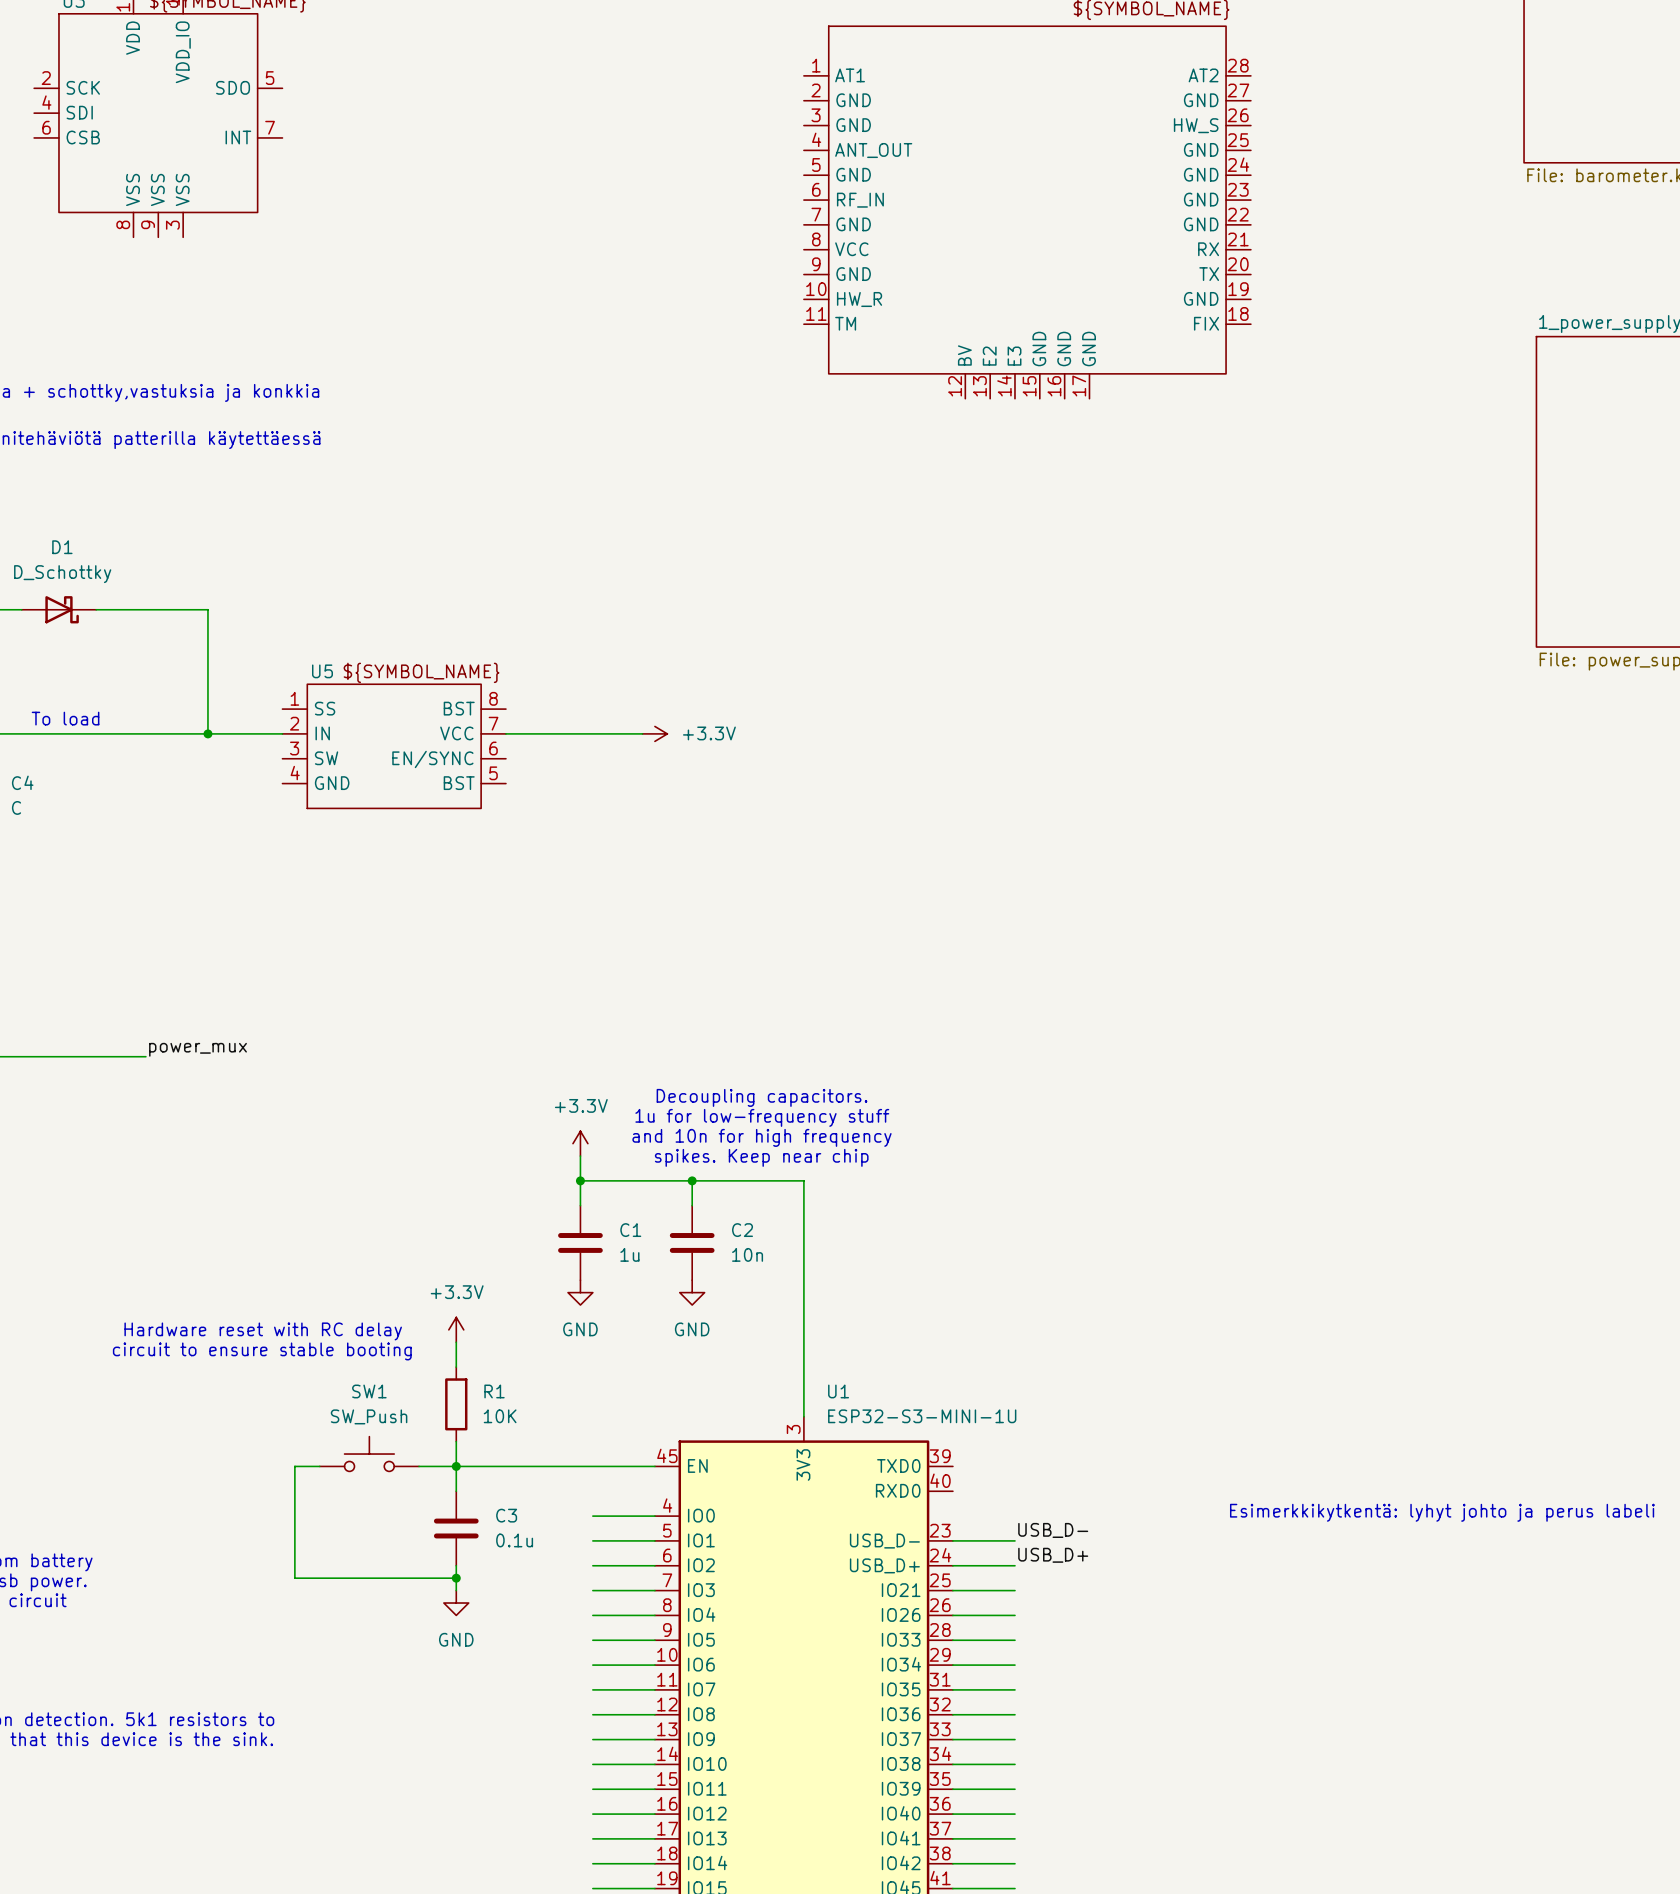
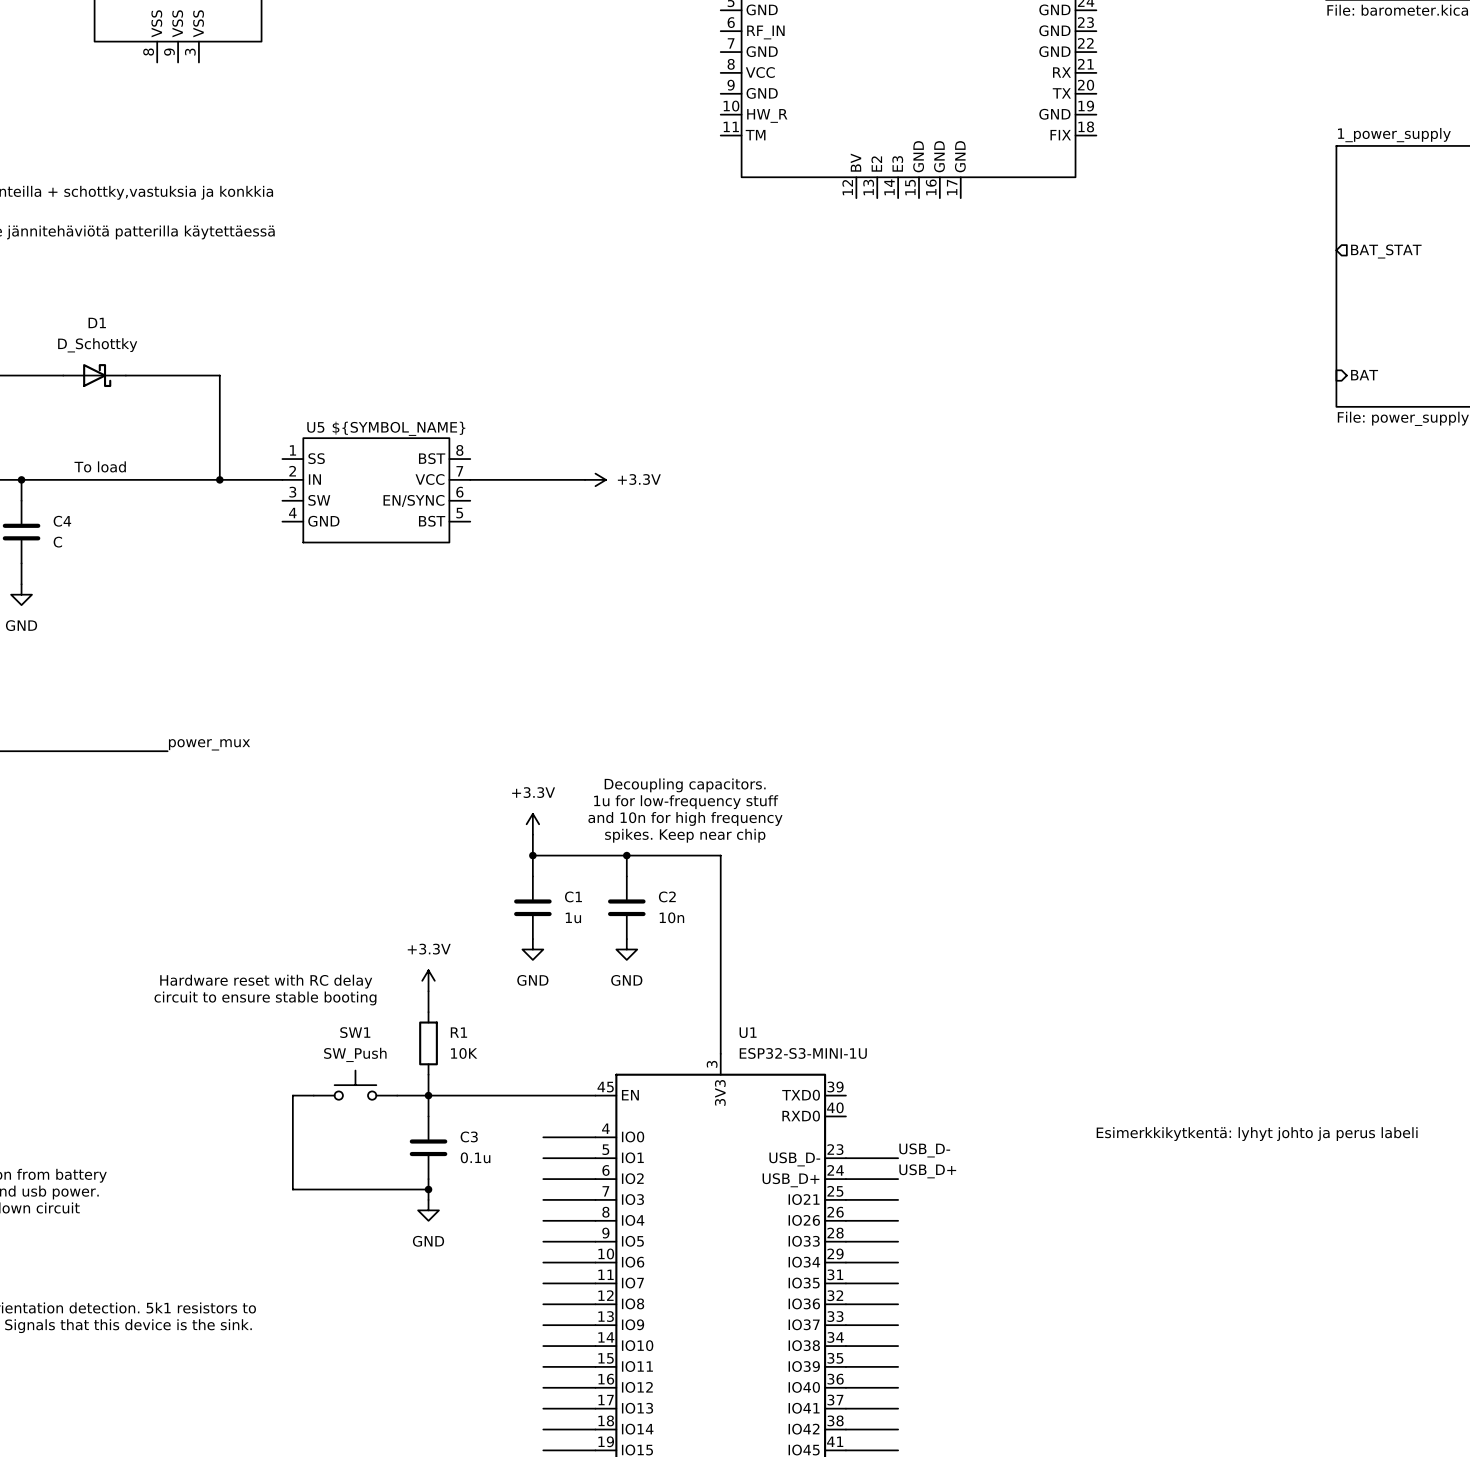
sheet pin: none -> BAT_STAT (1386, 251)
sheet pin: none -> BAT (1364, 375)

